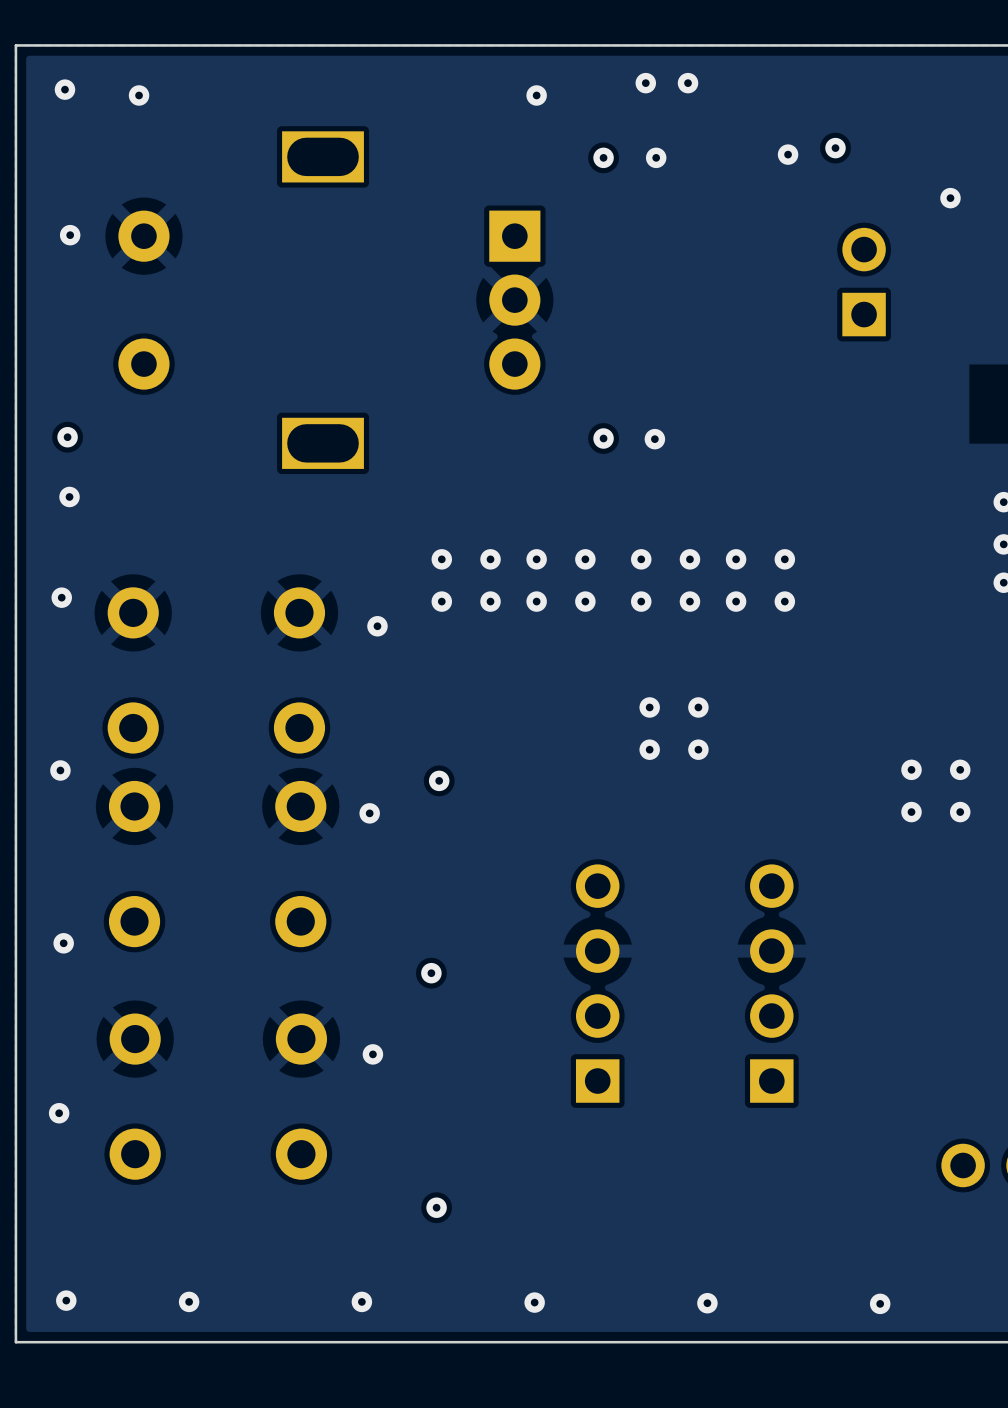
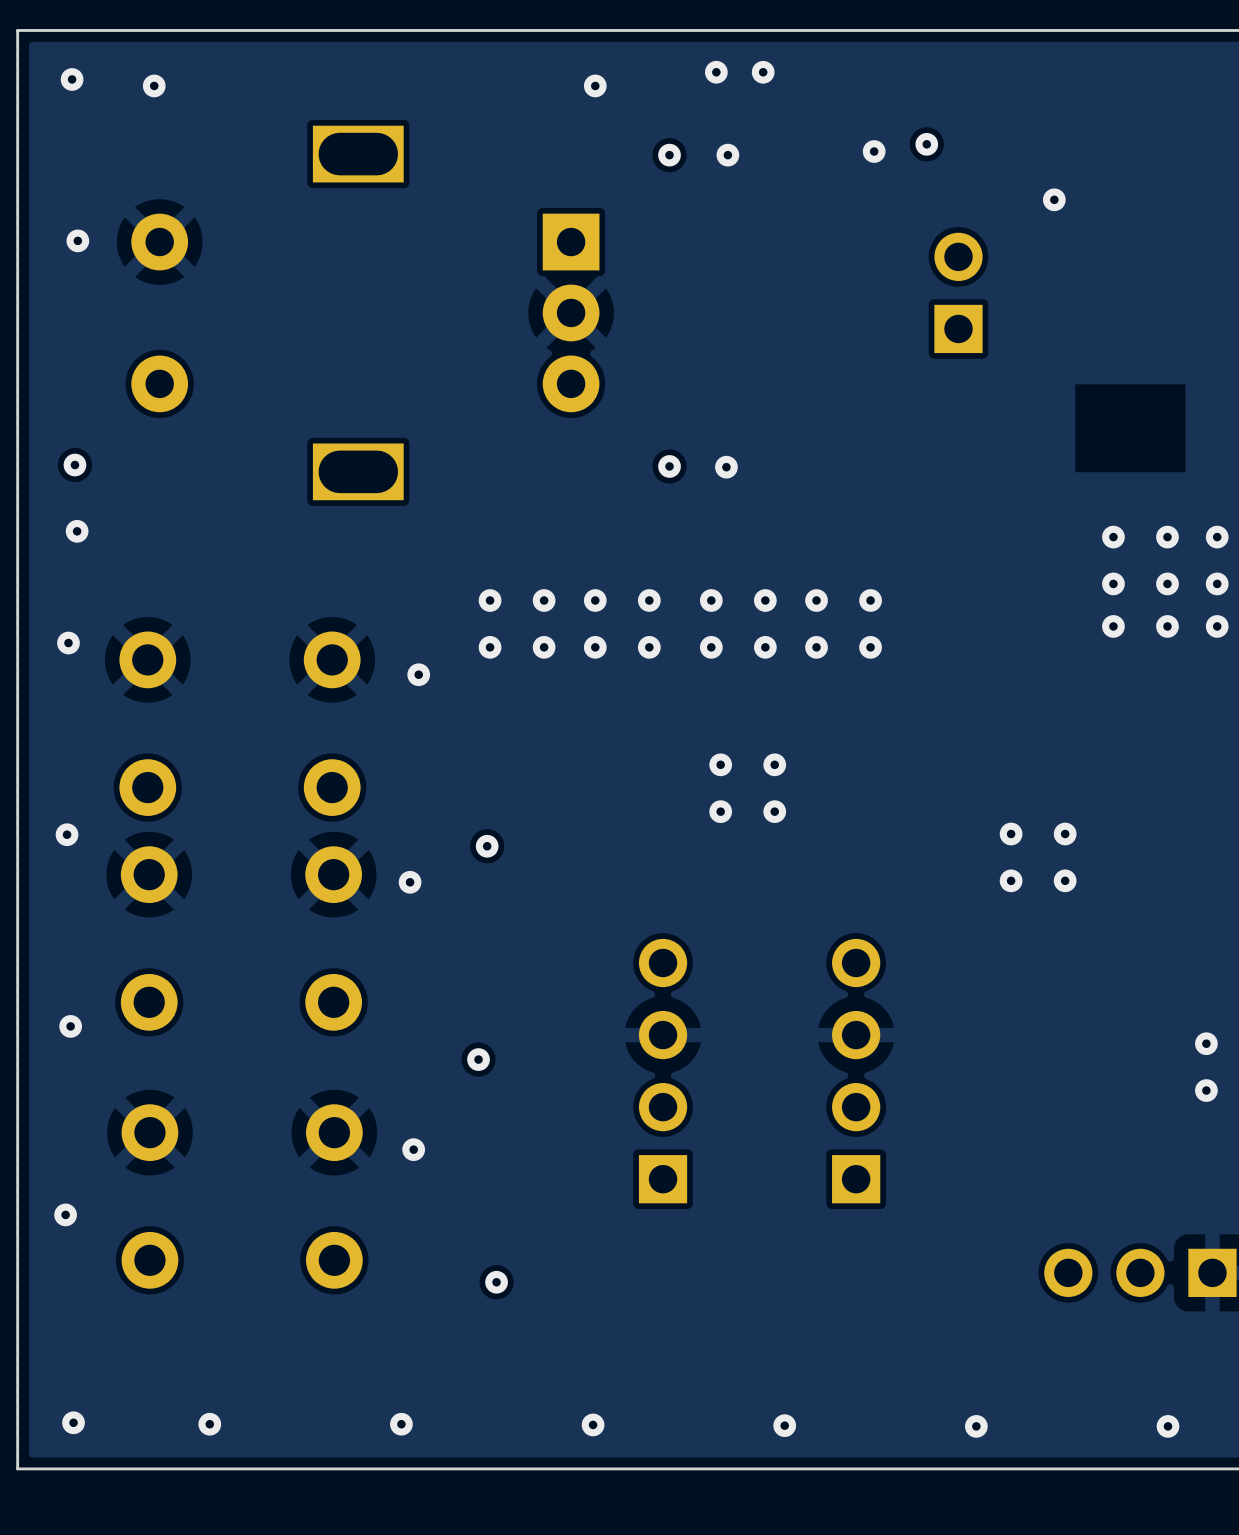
via position: (436, 1207) -> (496, 1282)

